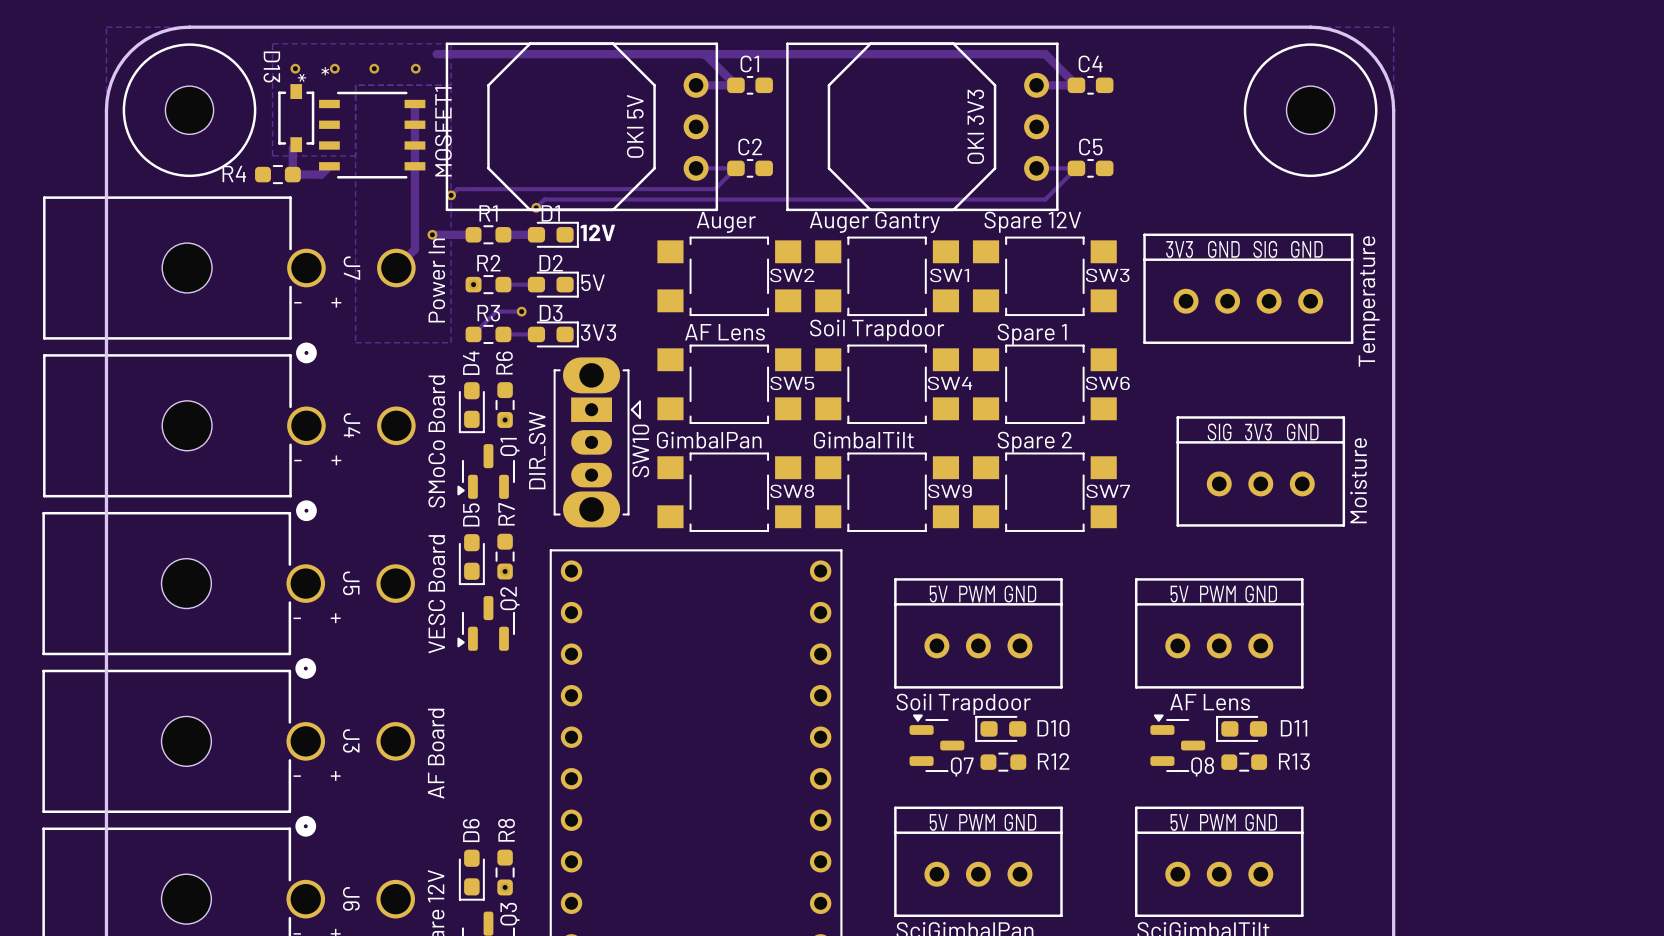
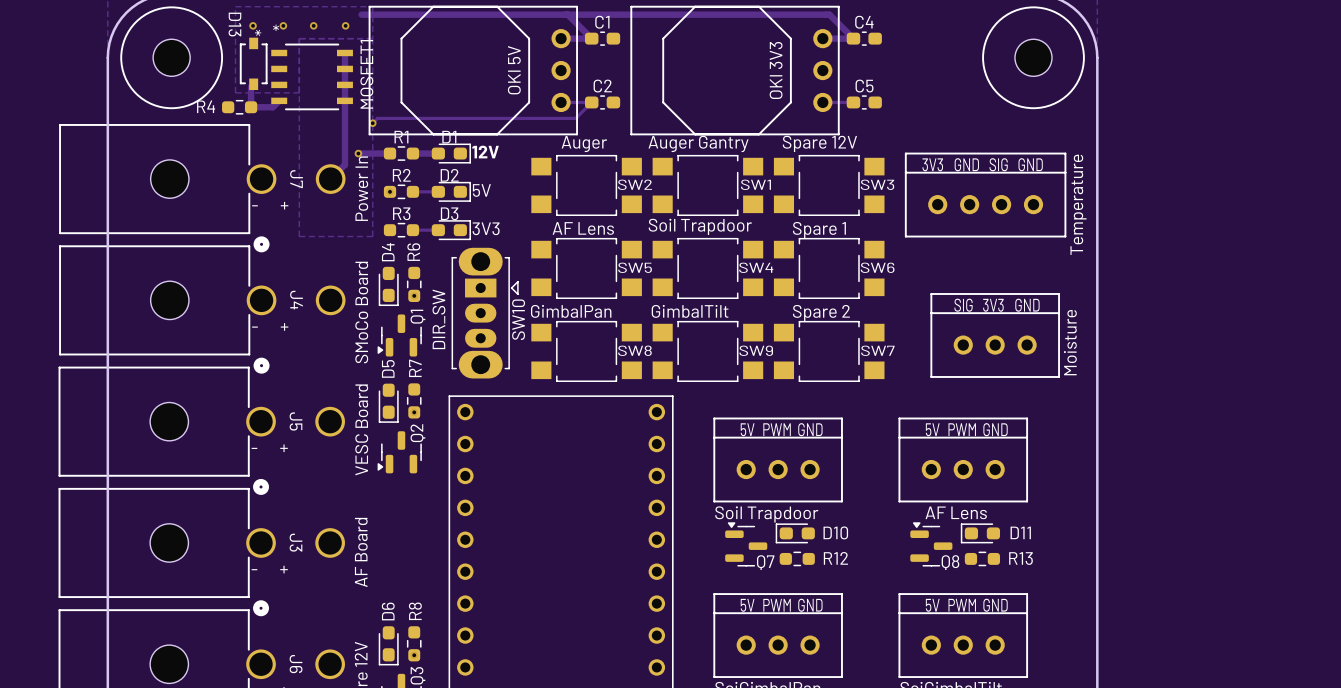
track: (1076, 168) (1045, 199) (544, 199) (536, 207) -> none
via: (536, 207) -> none
track: (521, 311) (496, 311) (473, 334) -> none
via: (521, 311) -> none

